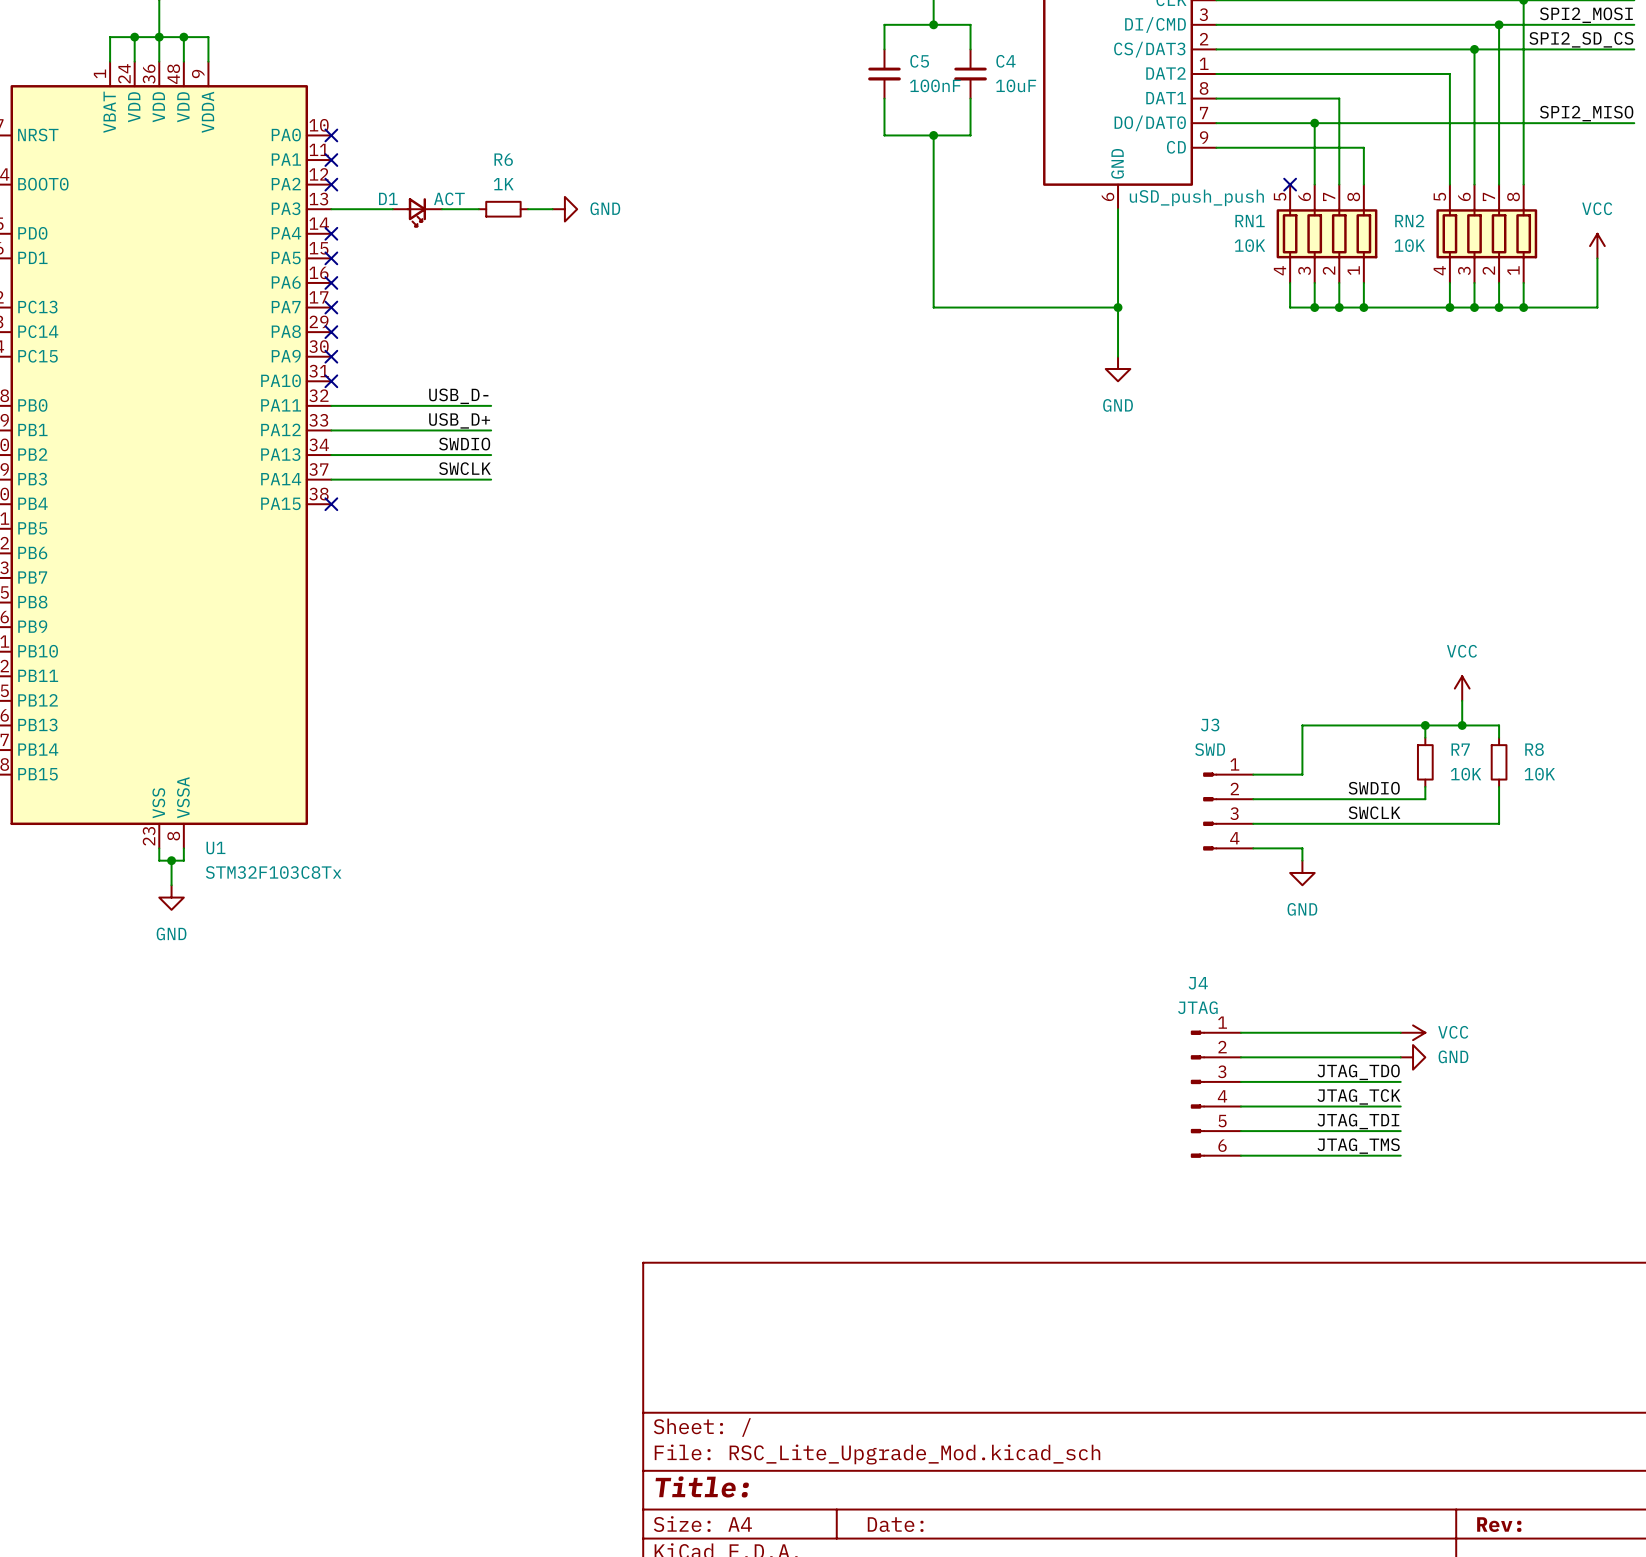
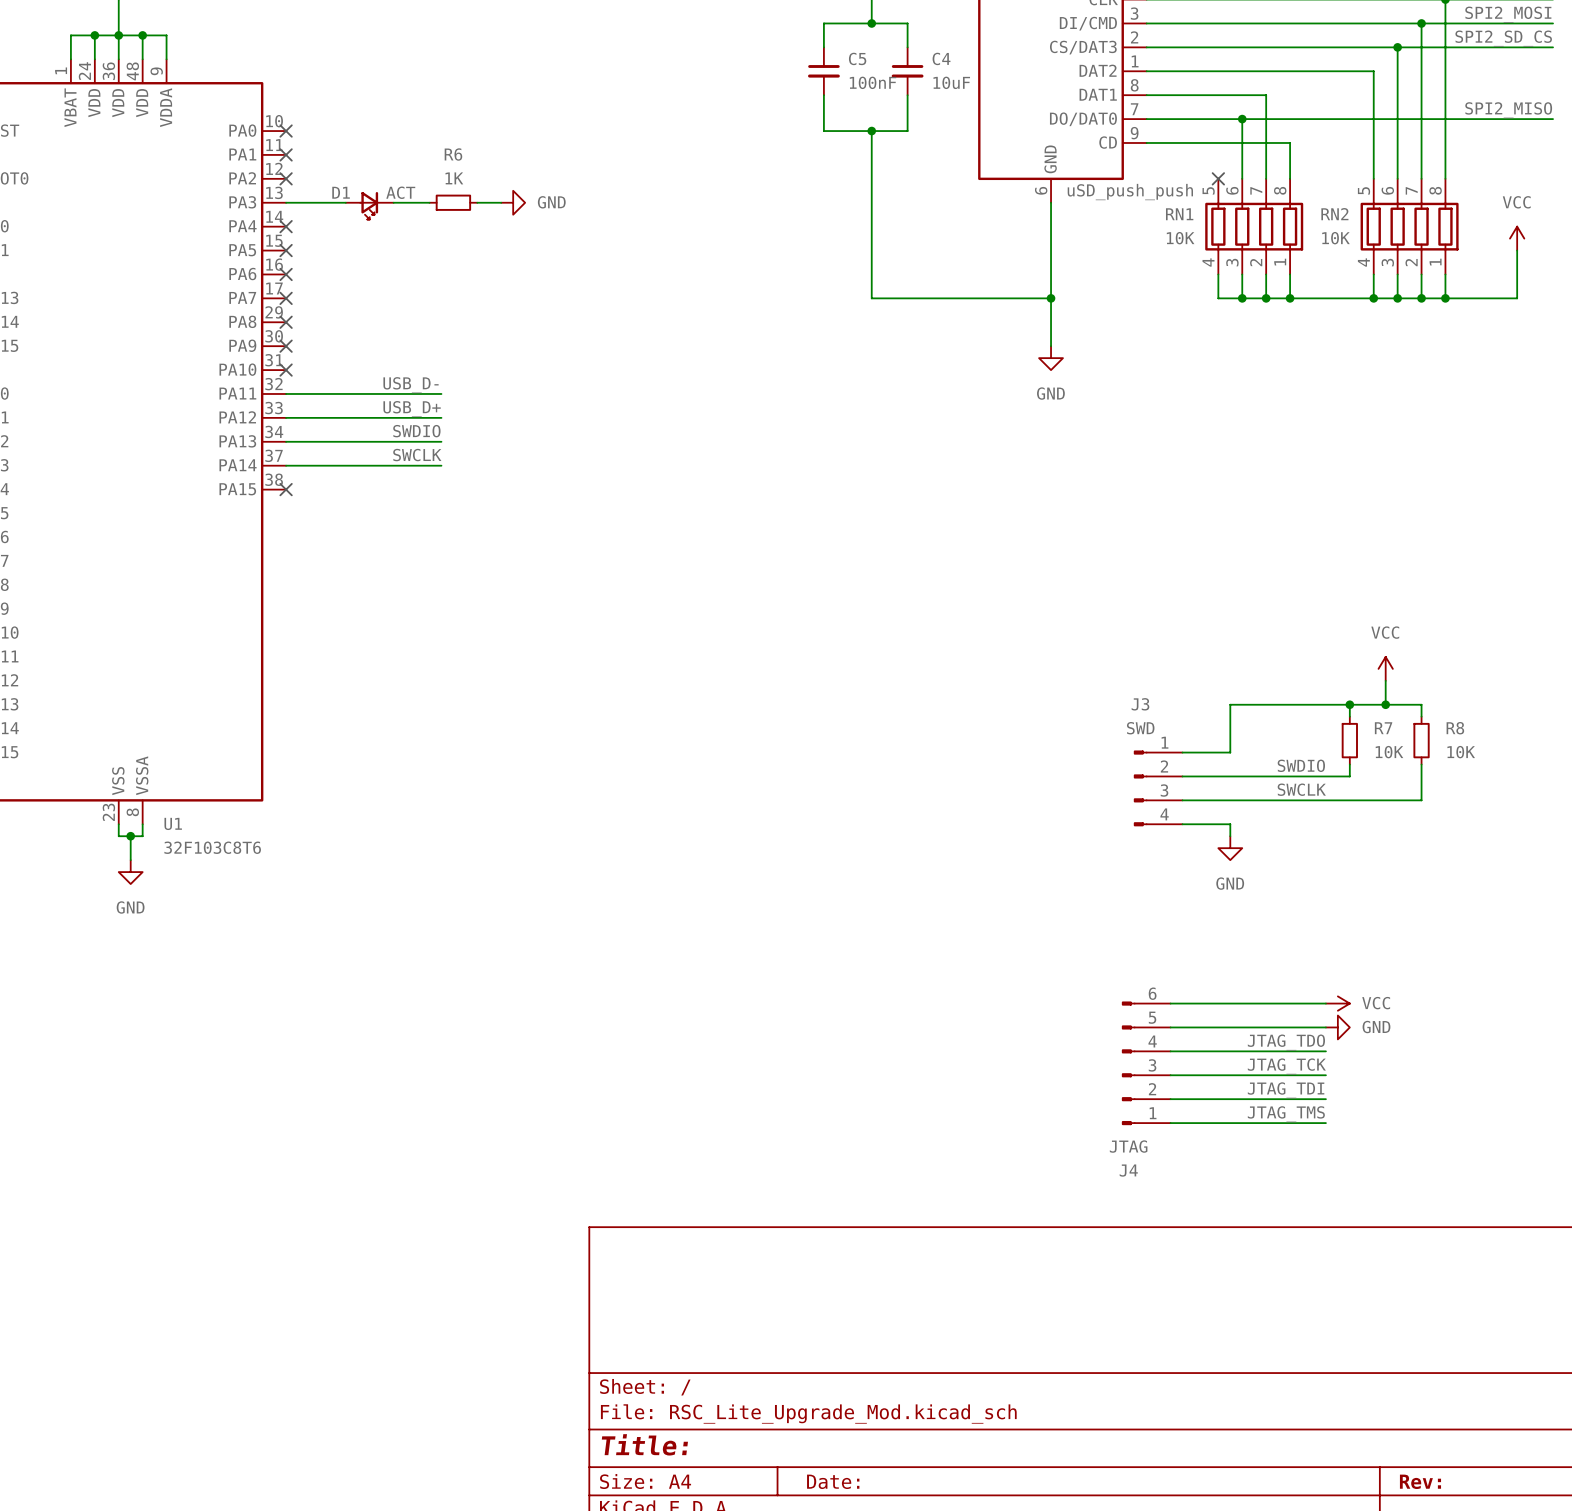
U1 value: STM32F103C8Tx (273, 872) -> 32F103C8T6 (212, 847)
J4 flip: as is (1197, 1094) -> up-down (1128, 1063)

